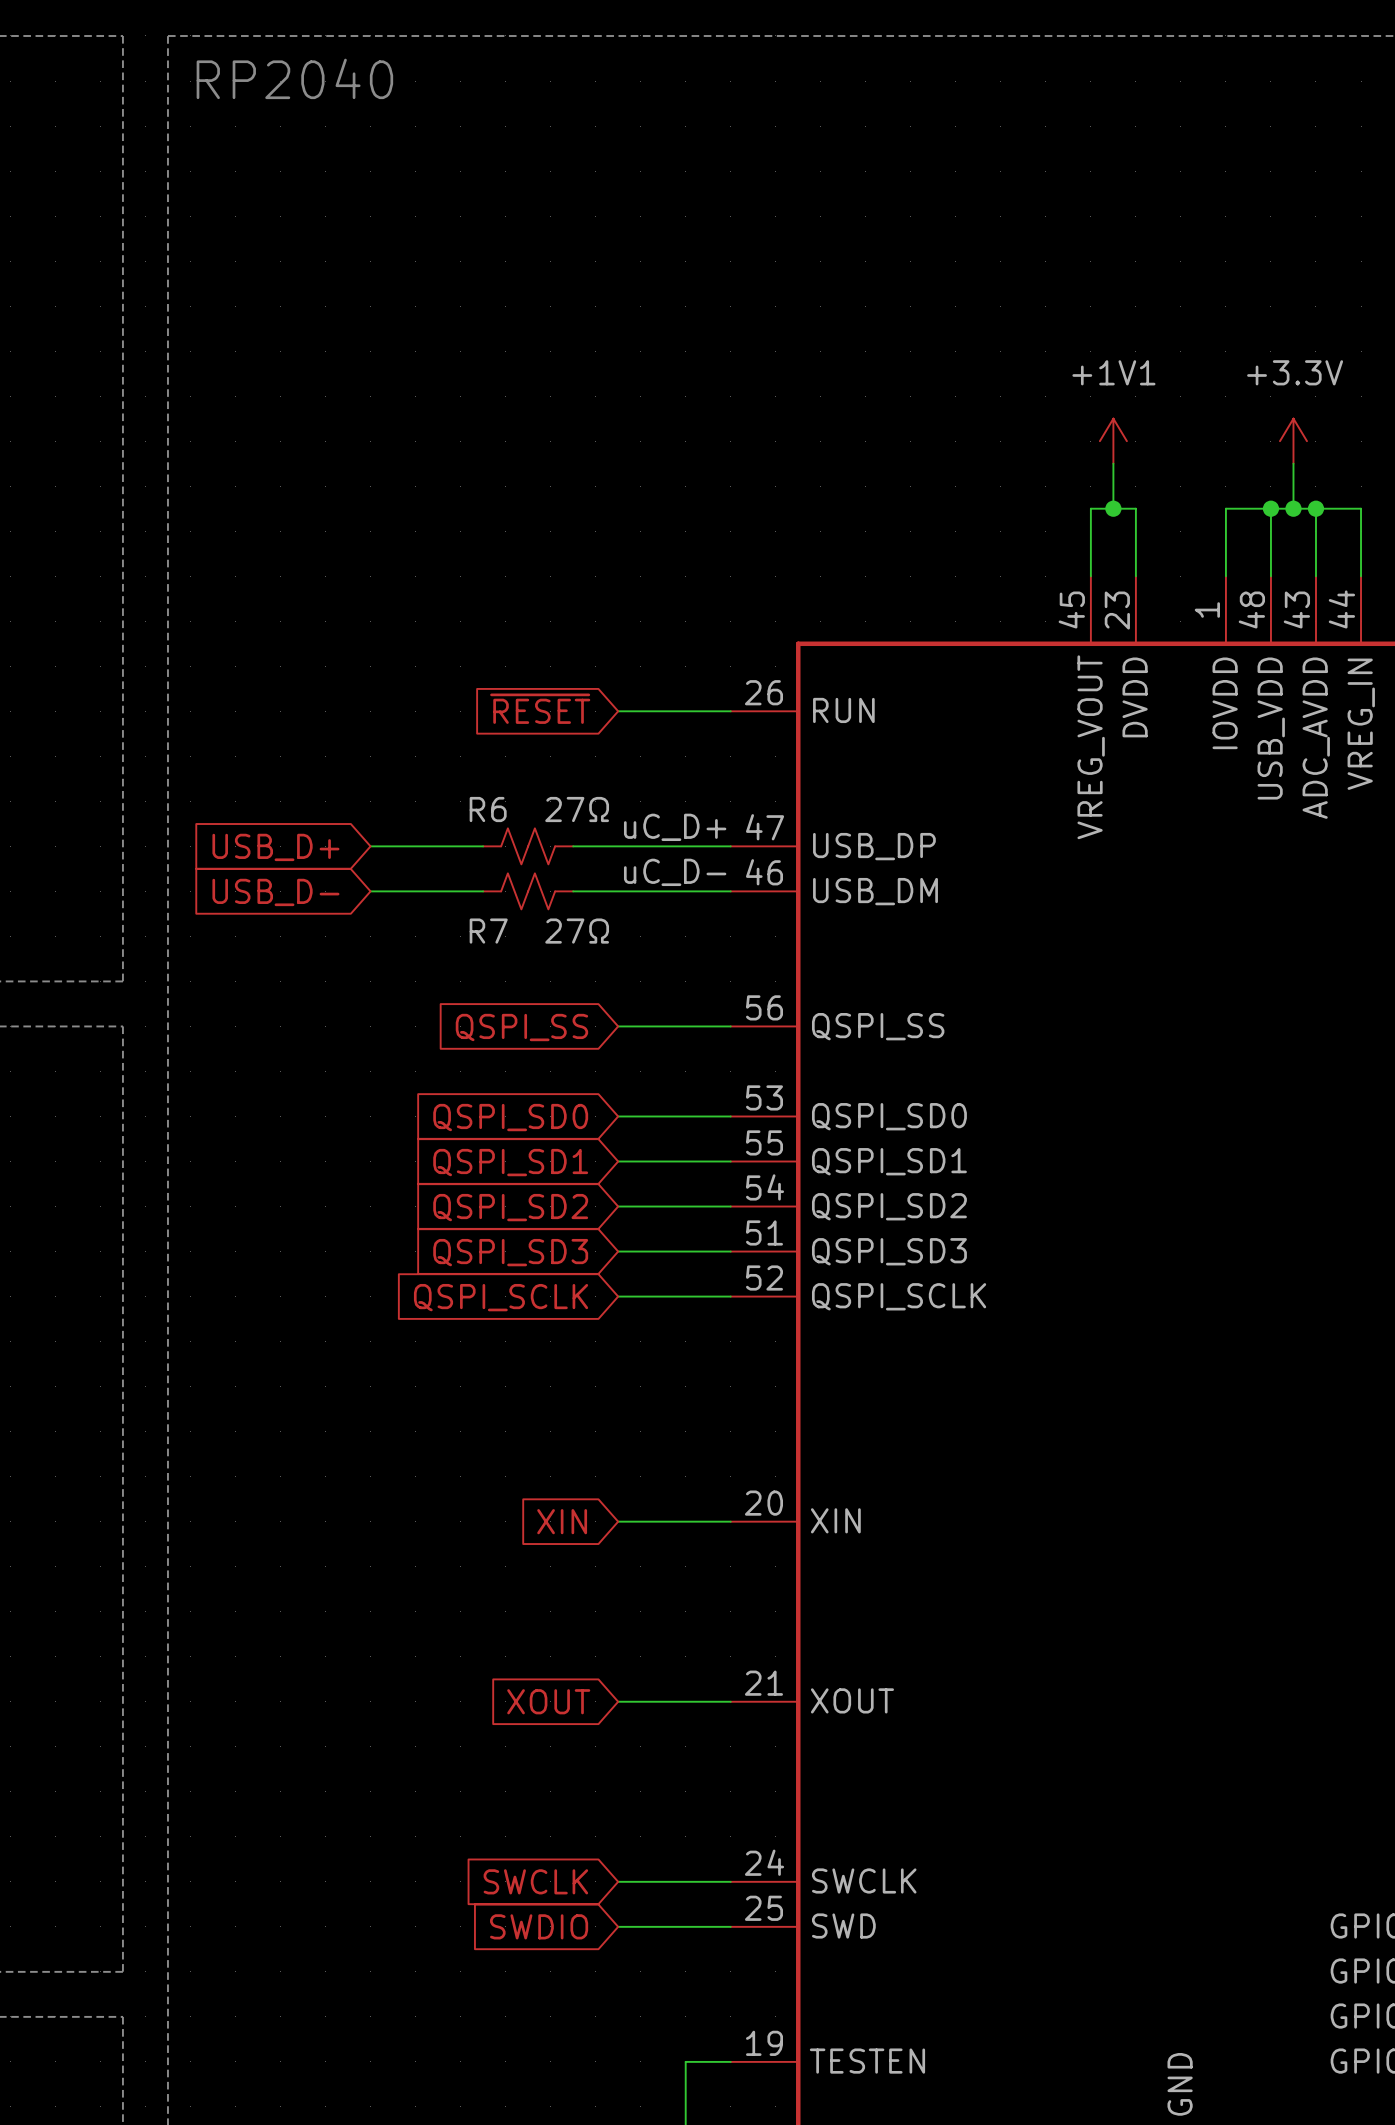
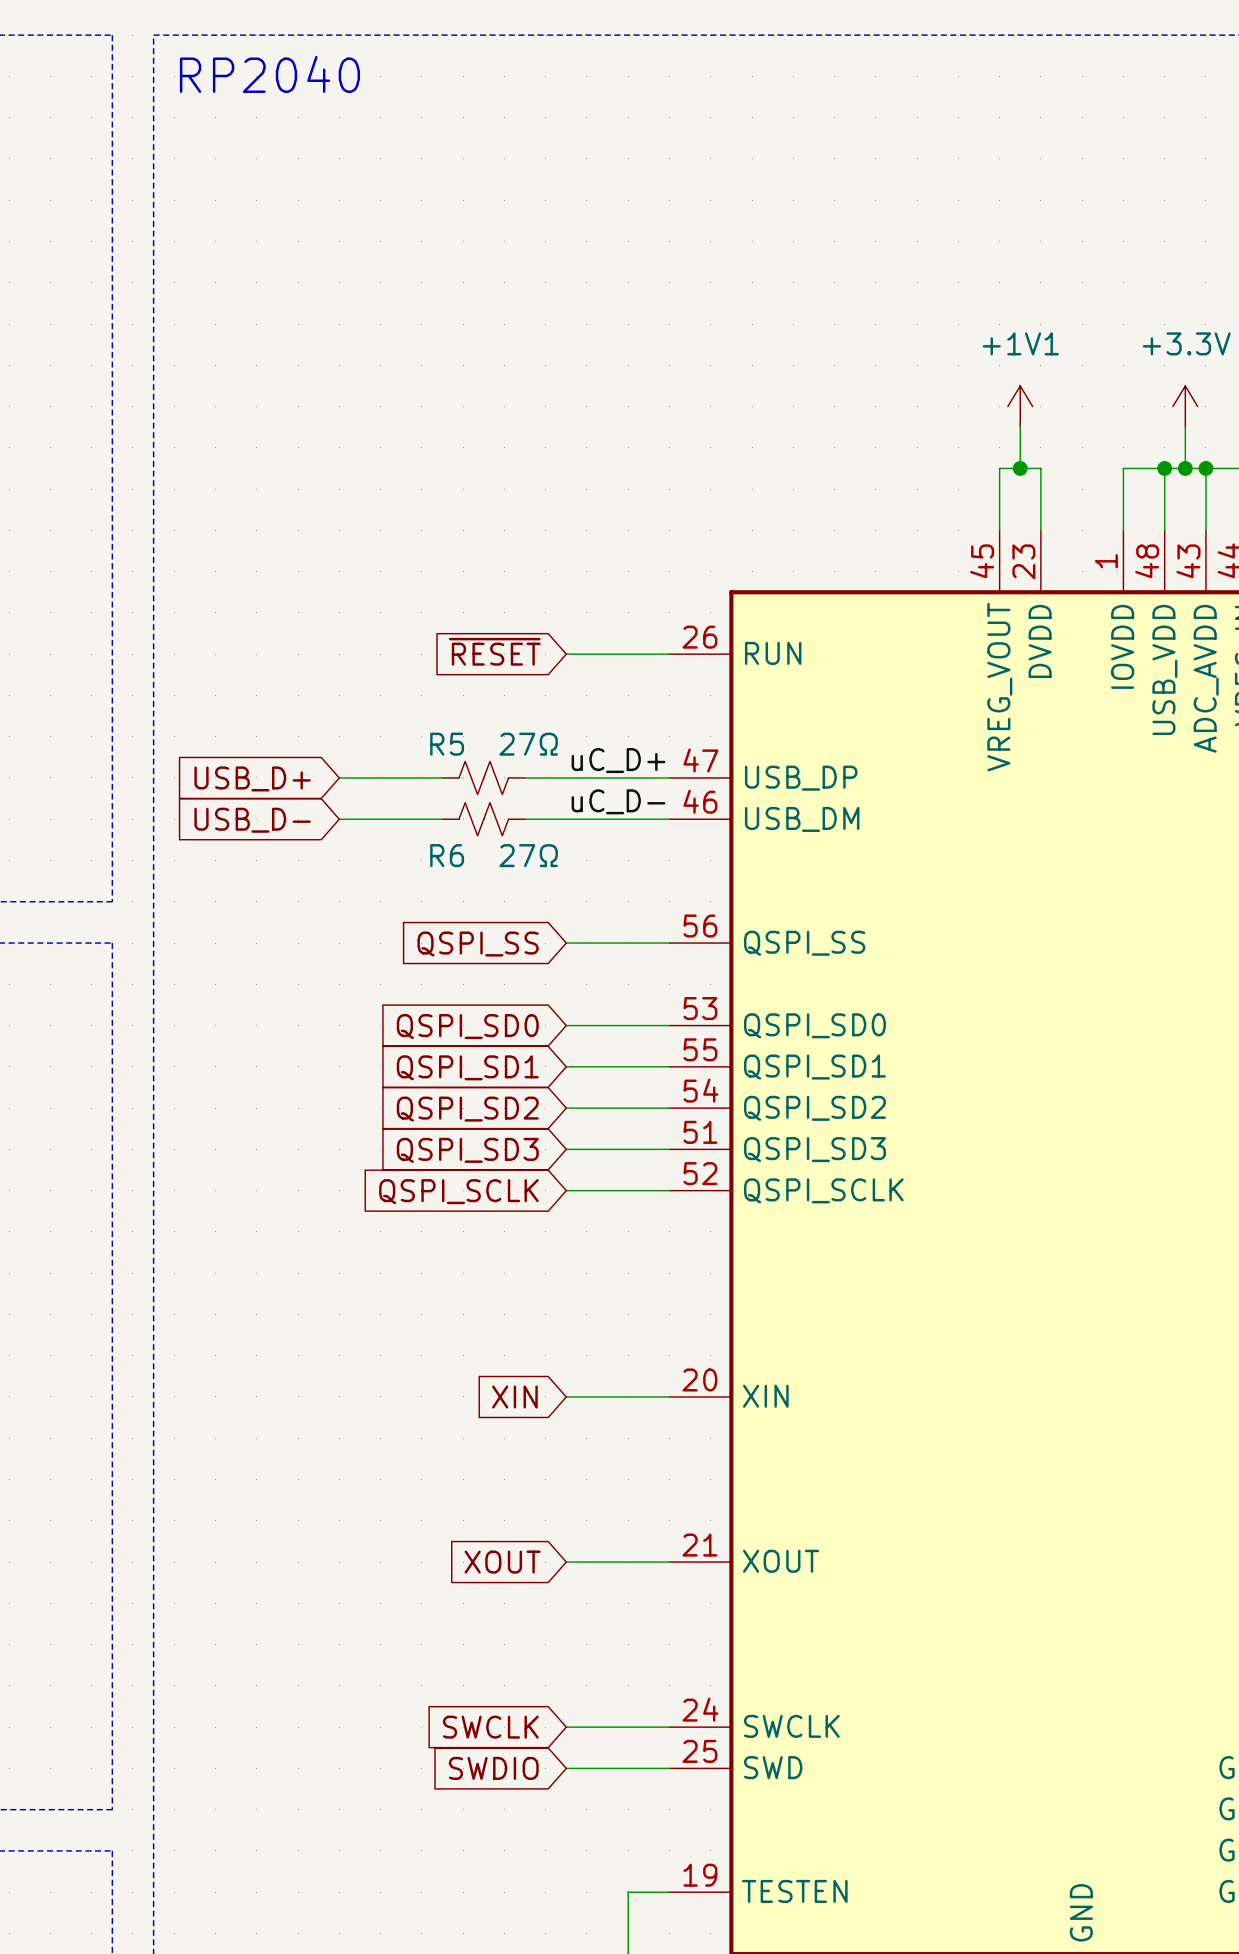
R6 name: R6 (488, 809) -> R5 (447, 744)
R7 name: R7 (488, 931) -> R6 (447, 855)

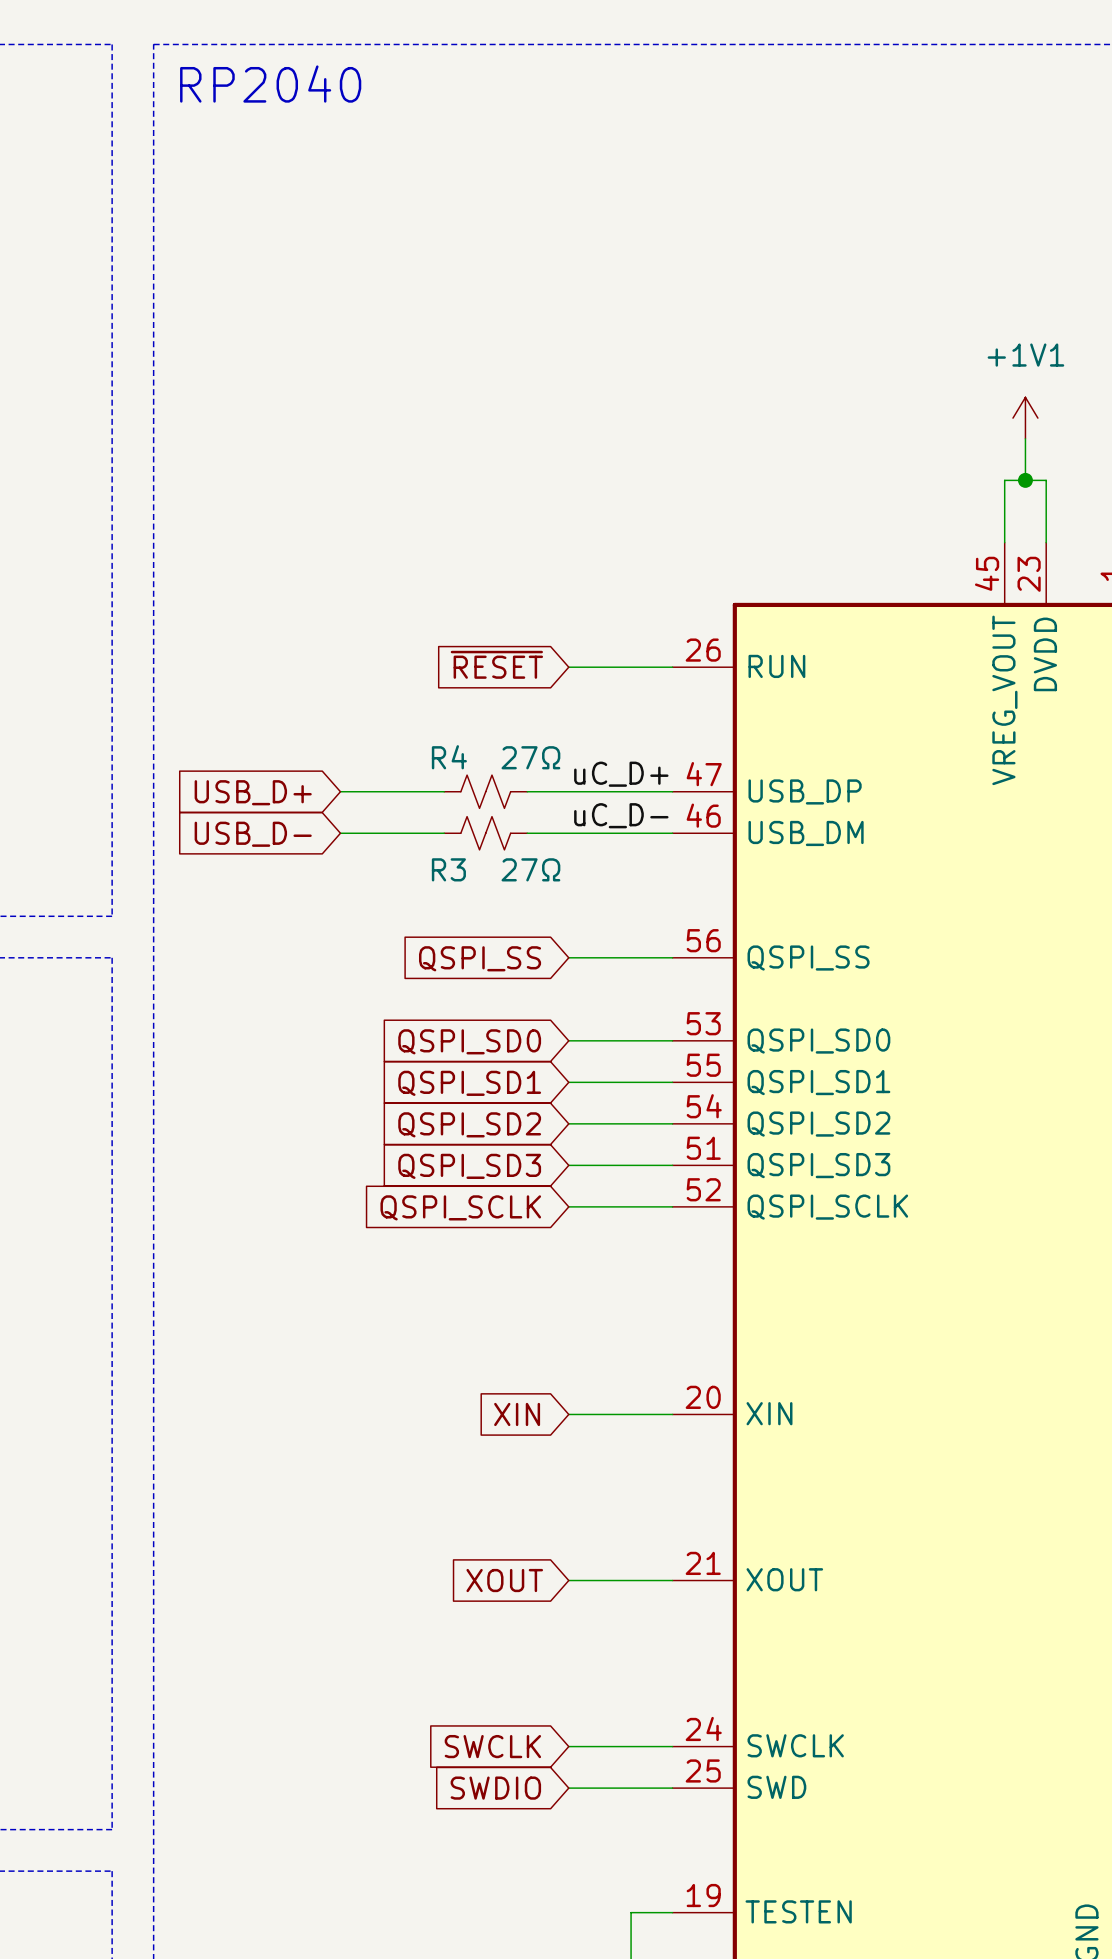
R5 name: R5 (447, 744) -> R4 (449, 757)
R6 name: R6 (447, 855) -> R3 (448, 869)

